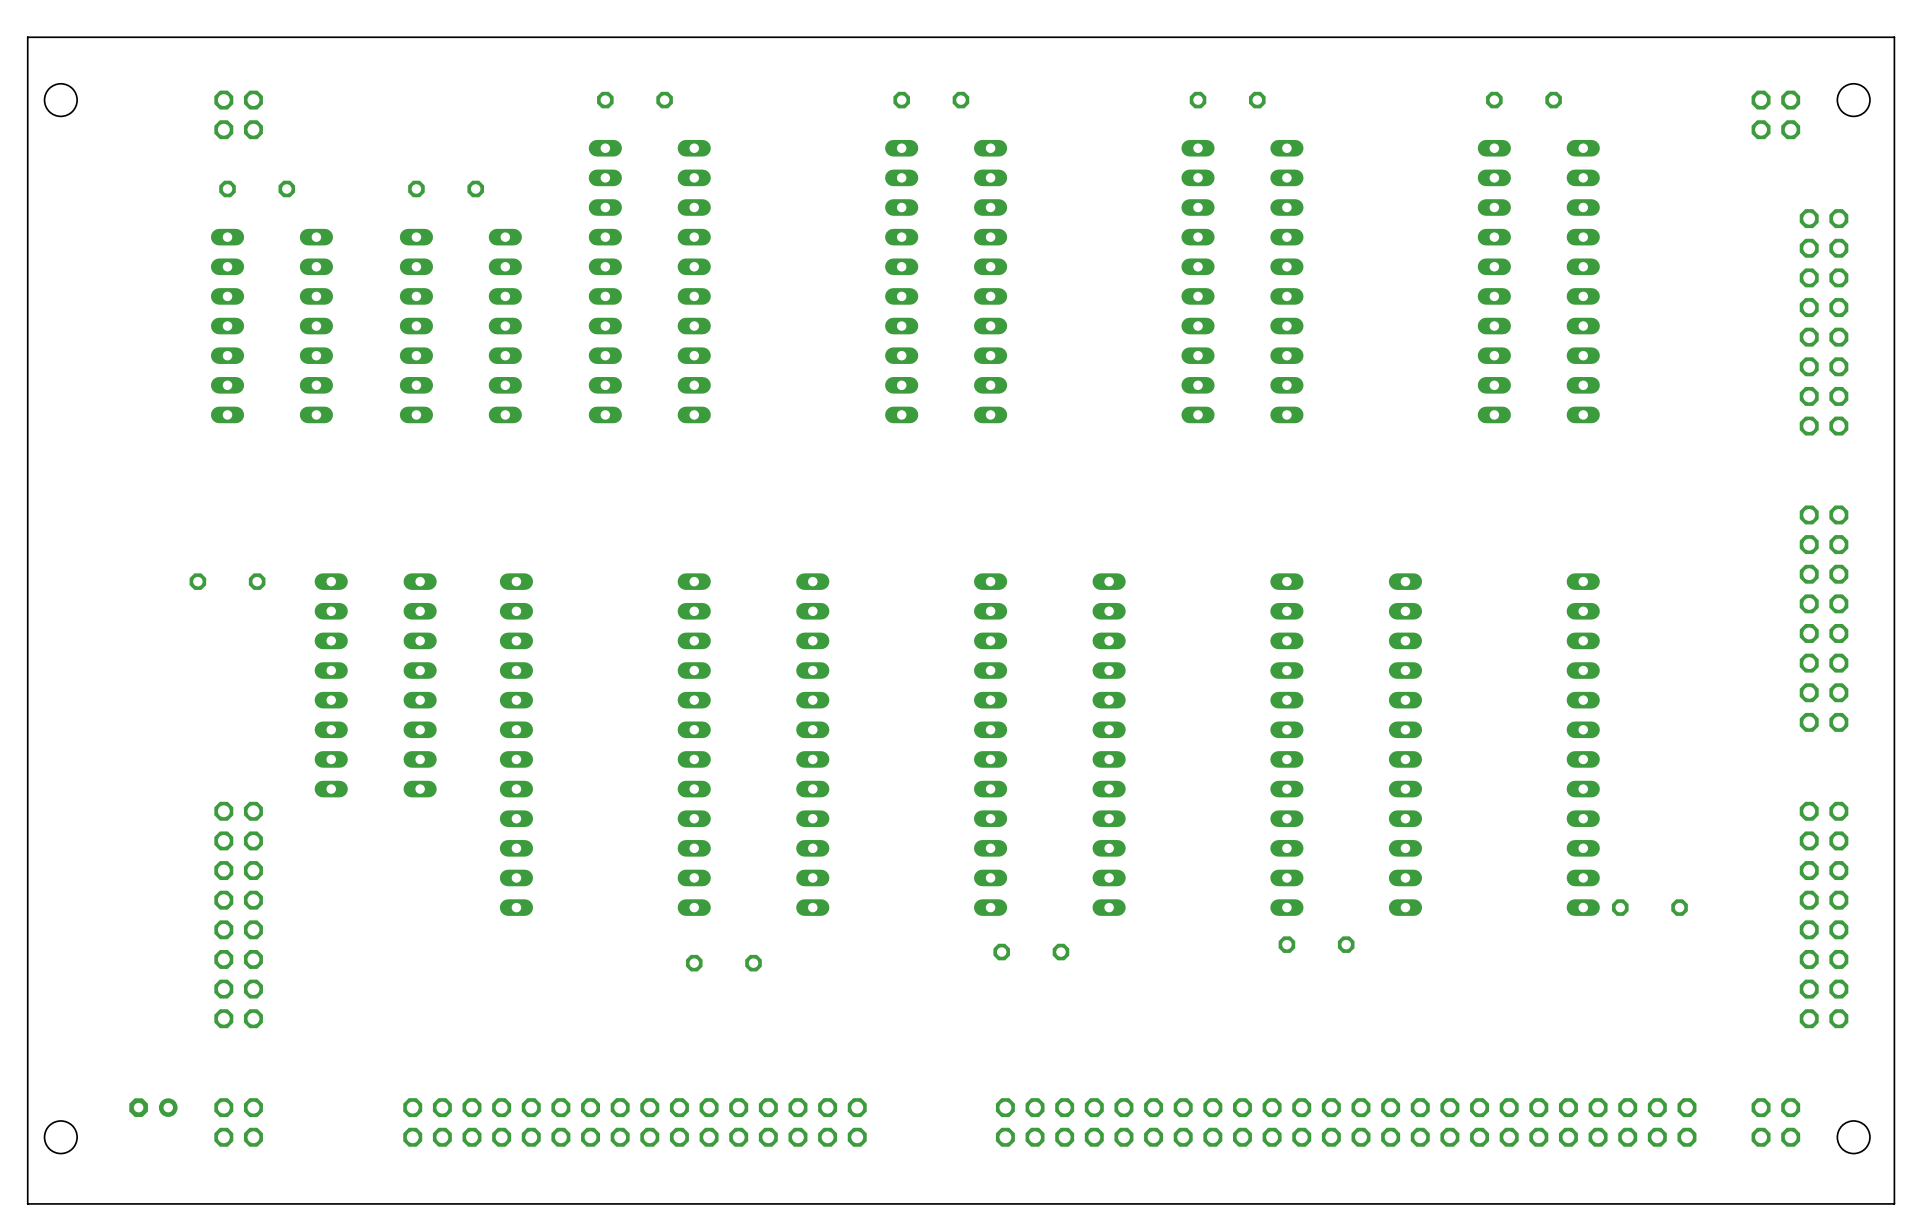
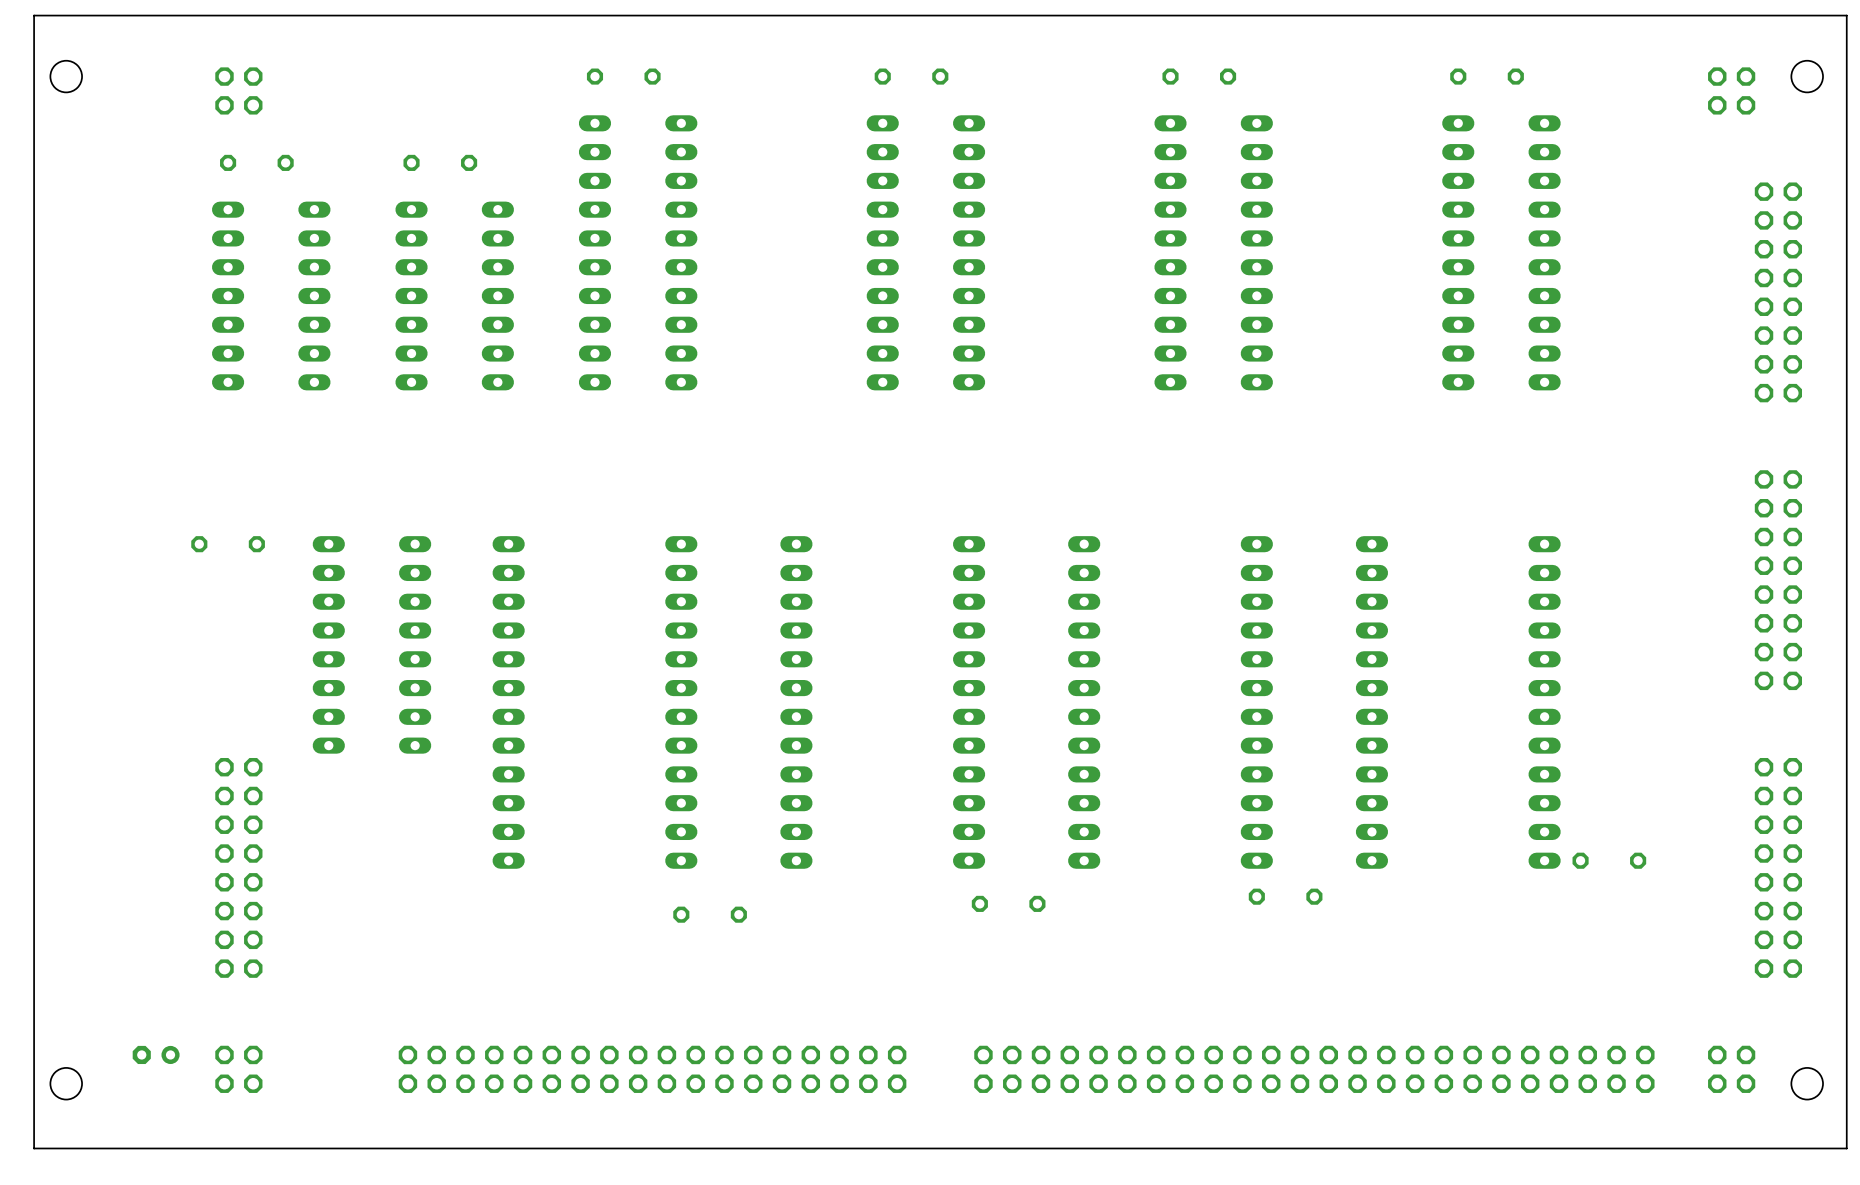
part: none -> (652, 1069)

